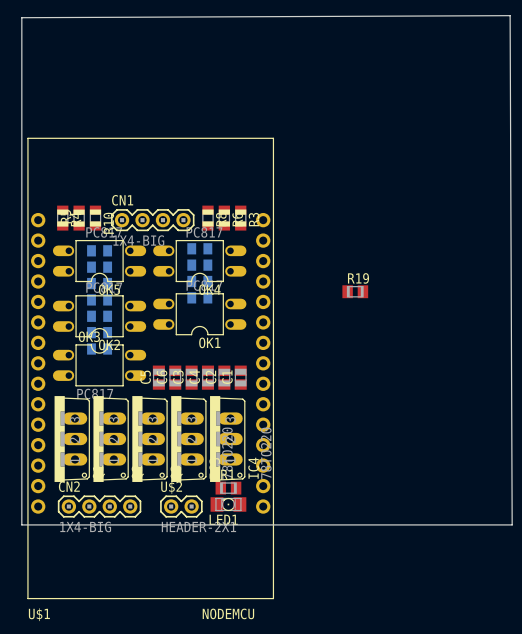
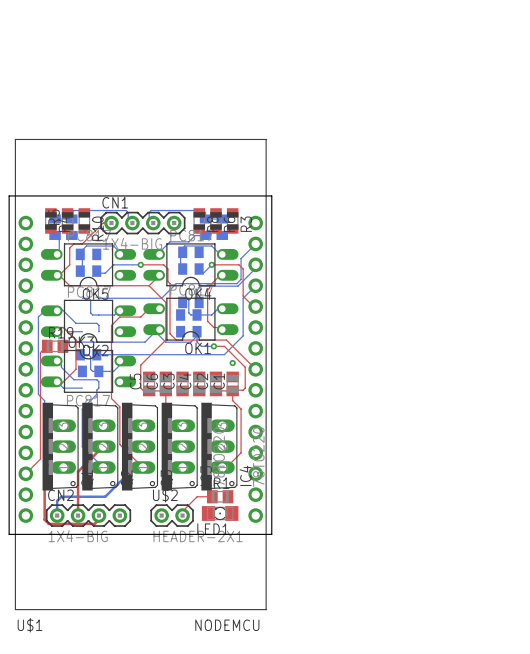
board edge: (21, 193) (21, 17) (510, 15) (512, 524) (278, 524) -> (9, 195) (271, 195) (271, 534)
bottom track: none -> (55, 219) (71, 219) (71, 212) (73, 210) (126, 210) (128, 212) (128, 223)
bottom track: none -> (222, 219) (205, 219) (205, 212) (203, 210) (151, 210) (149, 212) (149, 223)
top track: none -> (107, 223) (103, 223) (82, 243) (73, 243) (69, 248) (69, 264) (59, 275) (69, 285) (149, 285)
part: none -> (55, 227)
part: none -> (71, 227)
part: none -> (205, 227)
part: none -> (222, 227)
bottom track: none -> (55, 235) (59, 239) (59, 254)
bottom track: none -> (205, 235) (195, 235) (188, 241) (170, 241) (157, 254)
bottom track: none -> (255, 243) (241, 258) (241, 279) (236, 283) (176, 283) (161, 298) (98, 298)
bottom track: none -> (121, 254) (113, 246) (86, 246) (82, 250) (82, 273)
bottom track: none -> (220, 254) (211, 246) (184, 246) (180, 250) (180, 273)
top track: none -> (140, 264) (163, 264) (167, 269) (167, 281) (170, 283) (170, 333) (176, 340) (226, 340) (255, 369)
bottom track: none -> (140, 264) (113, 264) (105, 273) (98, 273)
via: none -> (140, 264)
top track: none -> (211, 264) (238, 264) (243, 269) (243, 296) (255, 306)
bottom track: none -> (211, 264) (203, 273) (197, 273)
via: none -> (211, 264)
bottom track: none -> (255, 264) (255, 268) (237, 286) (200, 286) (197, 289) (197, 298)
top track: none -> (157, 275) (149, 285)
top track: none -> (220, 275) (207, 289) (207, 321) (213, 327) (220, 327)
top track: none -> (149, 285) (165, 302) (165, 340) (140, 365) (140, 388) (143, 390) (165, 390) (165, 421) (170, 425) (182, 425)
part: (199, 281) -> none
bottom track: none -> (255, 285) (243, 298) (243, 335) (224, 354) (98, 354)
part: (99, 283) -> none
R19 position: (355, 291) -> (55, 346)
bottom track: none -> (82, 298) (88, 298) (90, 300) (90, 312) (92, 314) (114, 314) (121, 307)
bottom track: none -> (180, 298) (186, 298) (188, 300) (188, 312) (190, 314) (211, 314) (220, 306)
part: (99, 299) -> none
top track: none -> (157, 306) (151, 306) (140, 317) (119, 317) (111, 325) (111, 398) (119, 406) (119, 444) (142, 467)
part: none -> (188, 314)
part: (99, 316) -> none
top track: none -> (59, 327) (63, 327) (75, 340) (75, 369) (59, 383)
bottom track: none -> (59, 327) (63, 327) (78, 342) (144, 342) (157, 329)
bottom track: none -> (157, 327) (157, 333) (165, 342) (190, 342) (197, 336)
bottom track: none -> (67, 331) (82, 331)
bottom track: none -> (98, 331) (98, 325) (96, 323) (75, 323) (59, 306) (48, 306) (38, 317) (38, 394) (44, 400) (44, 461) (50, 467) (63, 467)
part: none -> (188, 331)
bottom track: none -> (197, 331) (197, 342) (201, 346) (213, 346)
part: (99, 332) -> none
top track: none -> (47, 346) (40, 352) (40, 459) (25, 473)
top track: none -> (213, 346) (224, 346) (245, 367) (245, 388) (243, 390) (215, 390)
via: none -> (213, 346)
bottom track: none -> (82, 354) (88, 354) (90, 356) (90, 369) (92, 371) (113, 371) (121, 363)
bottom track: none -> (59, 363) (73, 379) (96, 379) (98, 381) (96, 394) (82, 409) (82, 446) (103, 467)
via: none -> (232, 363)
part: none -> (90, 371)
bottom track: none -> (59, 383) (63, 388) (82, 388)
top track: none -> (231, 390) (232, 400) (241, 409) (241, 452) (226, 467) (222, 467)
top track: none -> (63, 446) (57, 446) (44, 459) (44, 519) (48, 523) (94, 523) (98, 519) (98, 511)
top track: none -> (103, 446) (78, 471) (78, 511)
bottom track: none -> (140, 446) (130, 446) (126, 450) (126, 475) (105, 496) (61, 496) (57, 500) (57, 511)
top track: none -> (212, 498) (210, 496) (197, 496) (182, 511)

